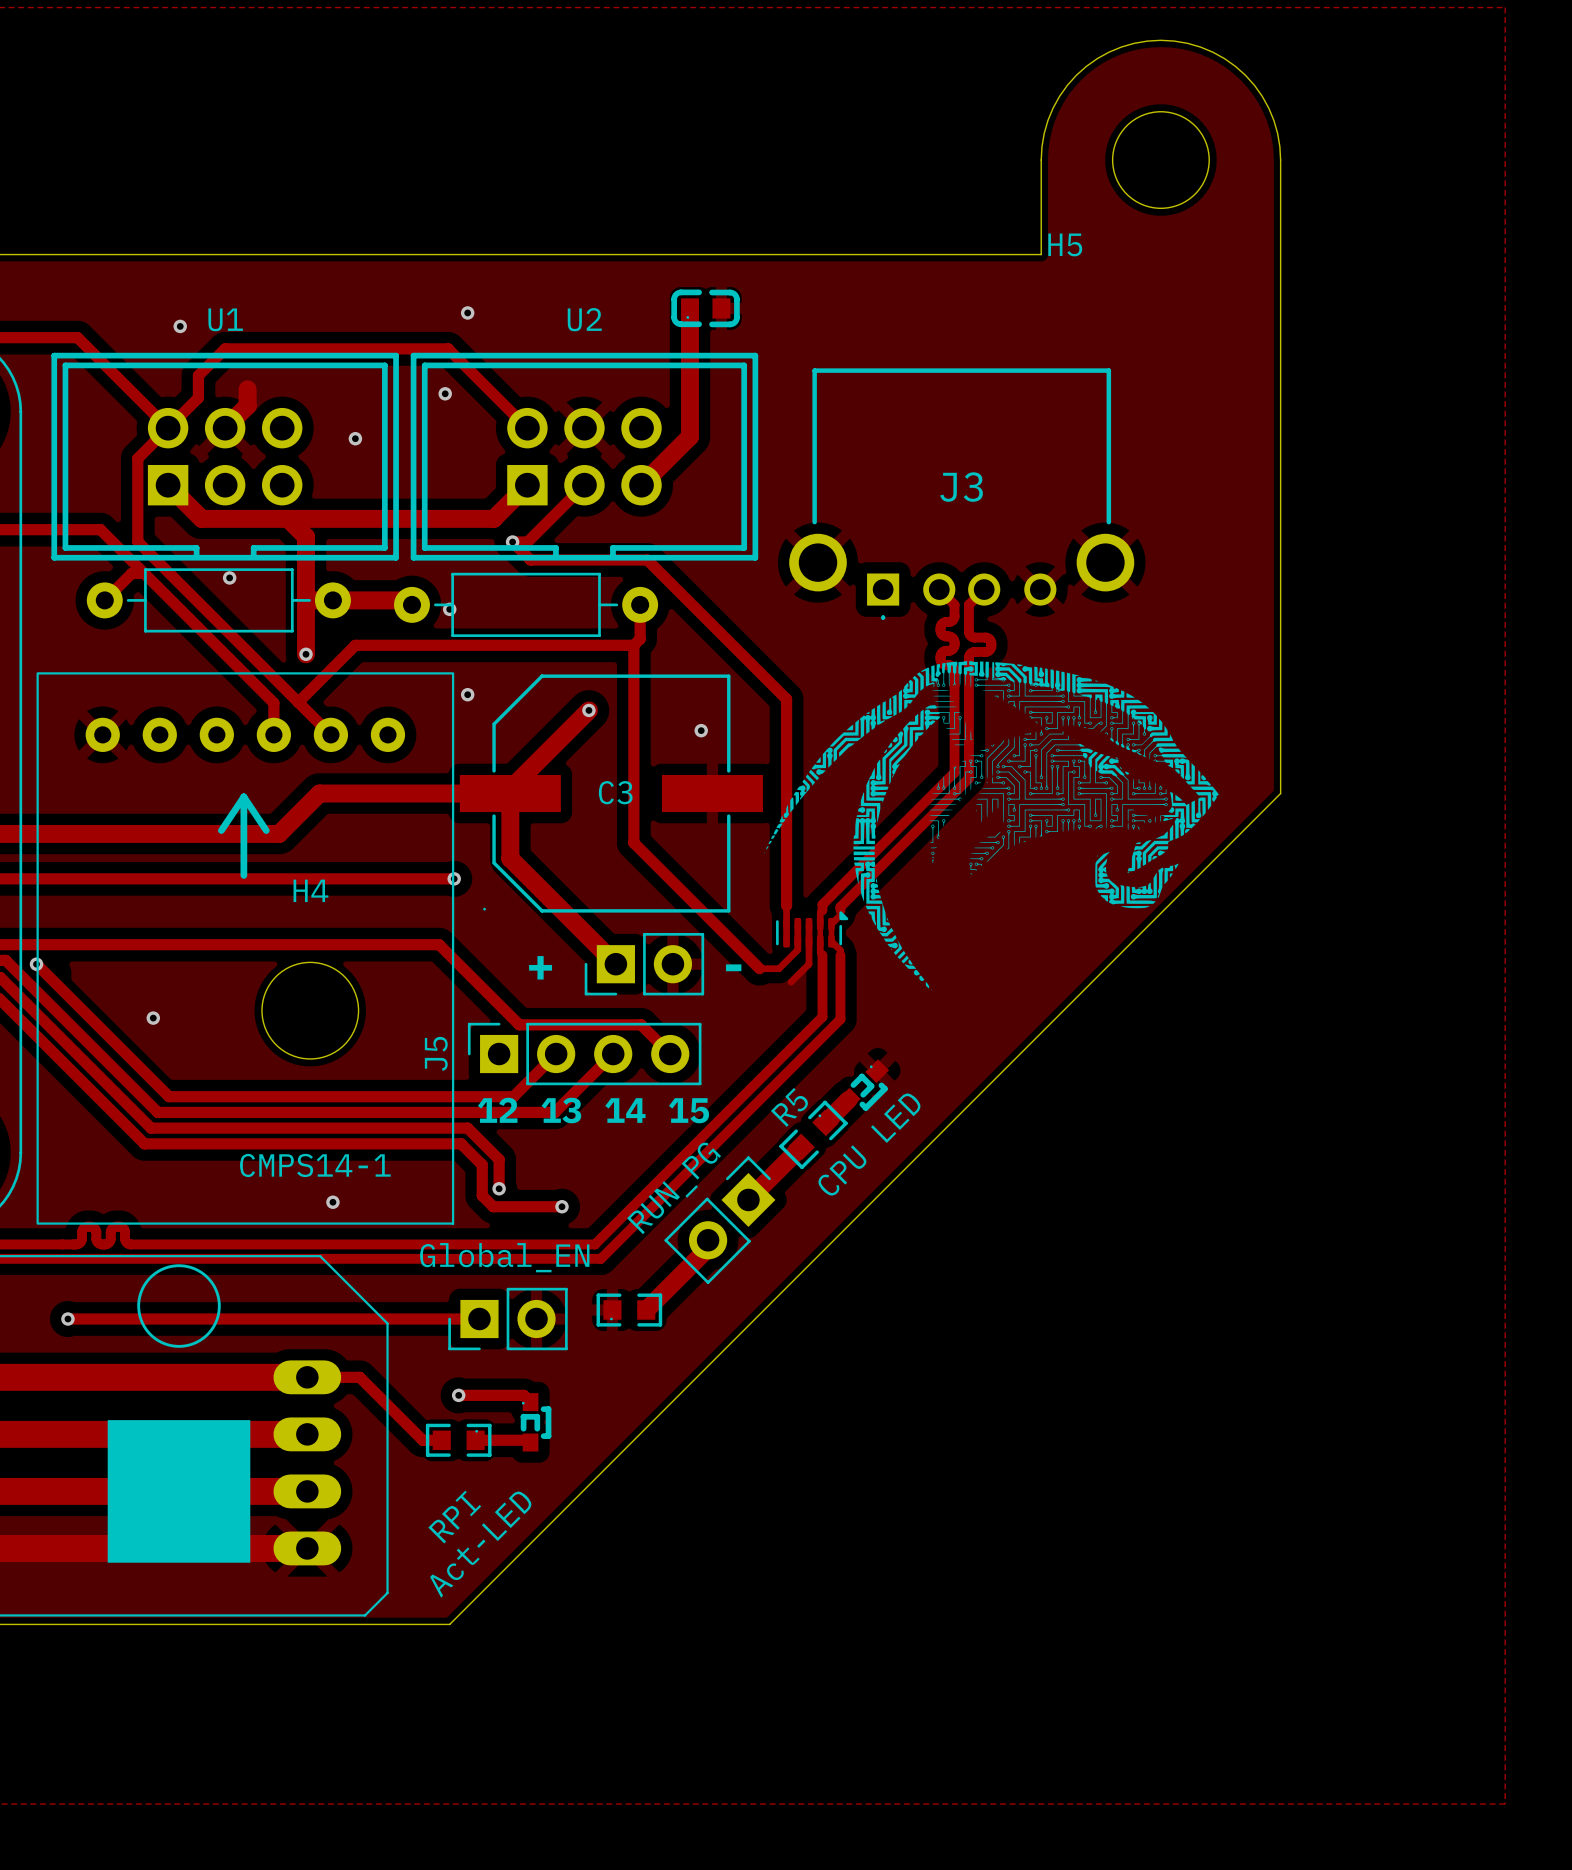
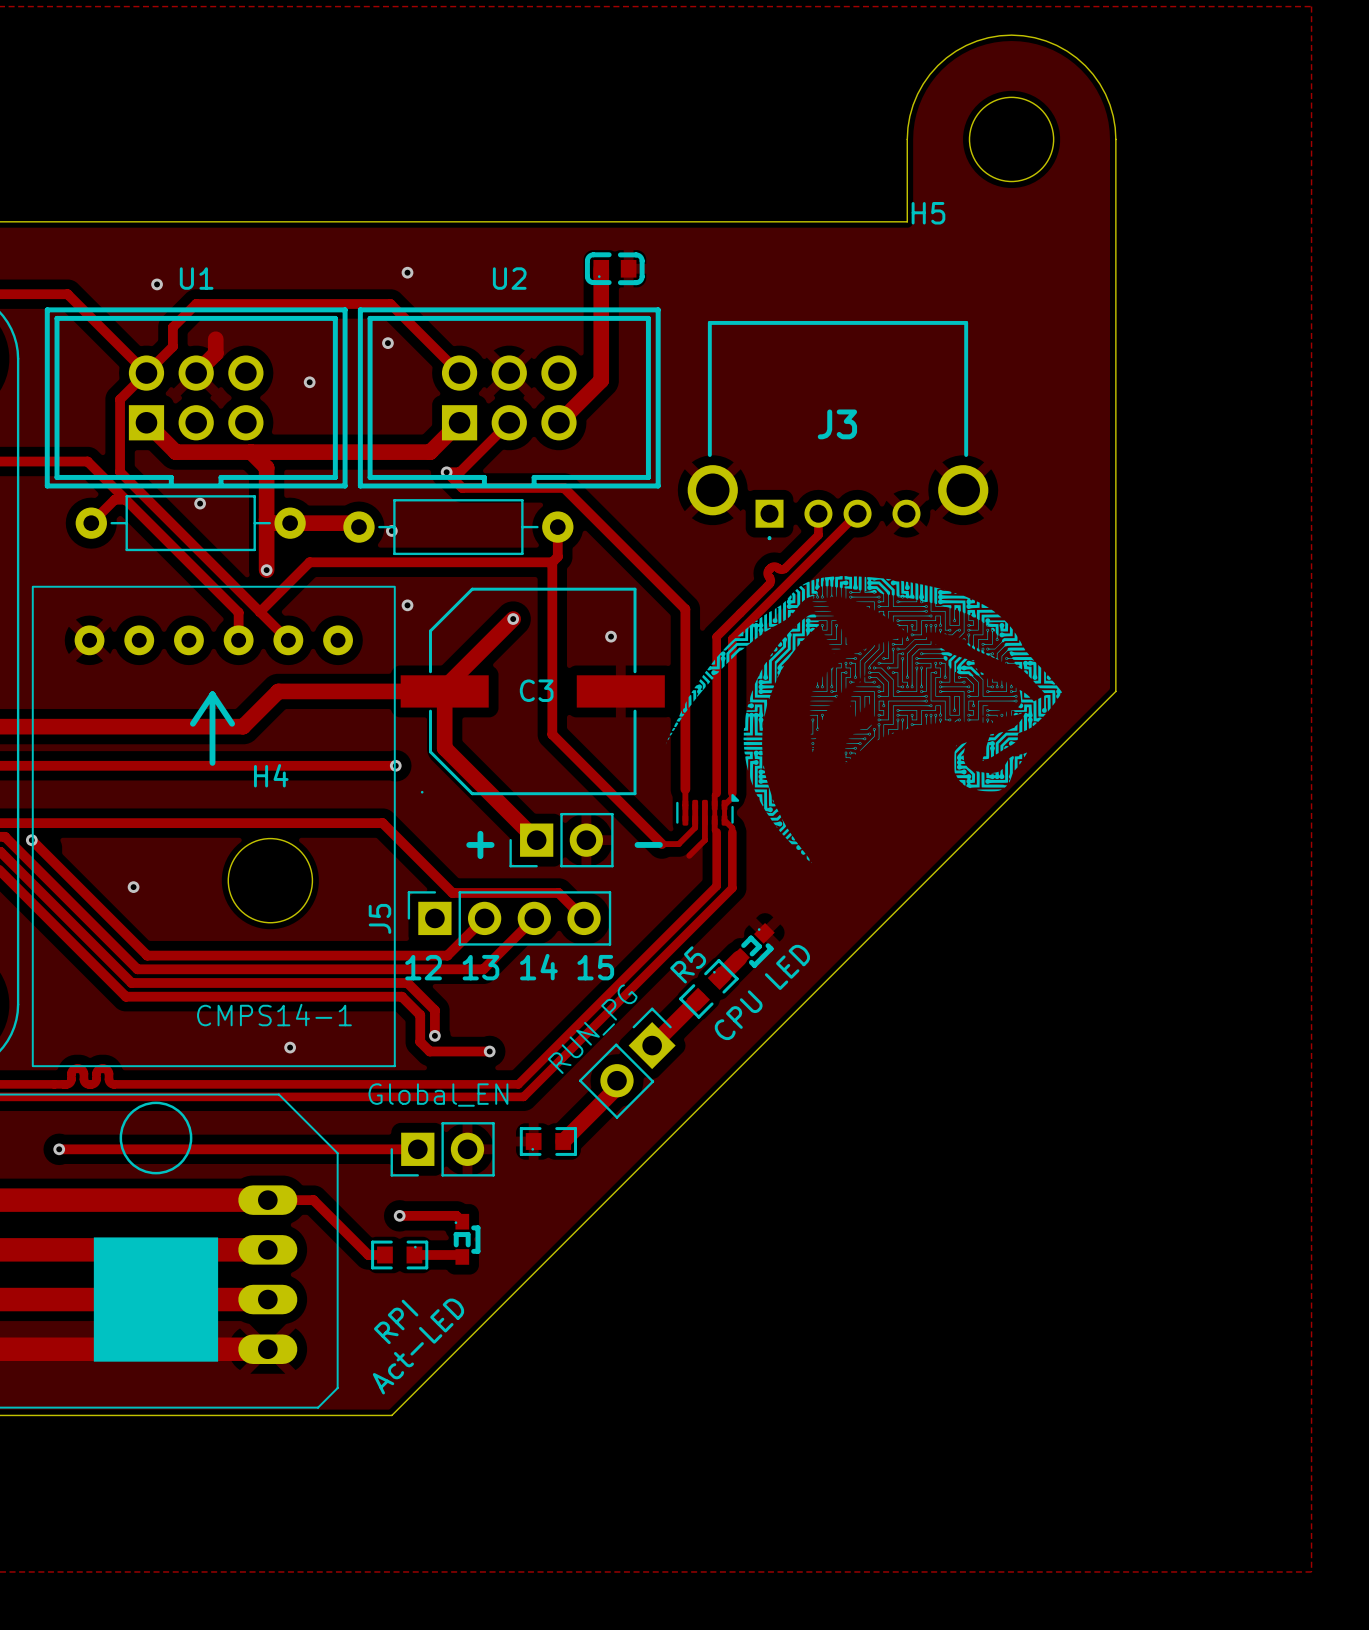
track: (939, 589) (954, 604) (953, 619) (943, 622) (940, 627) (942, 634) (951, 637) (954, 641) (953, 648) (942, 652) (940, 659) (942, 663) (951, 665) (954, 670) (954, 772) (822, 904) -> (769, 577) (769, 583) (716, 636) (716, 788)
track: none -> (818, 513) (818, 535) (784, 568) (778, 568)
track: (968, 604) (969, 634) (973, 637) (987, 638) (991, 643) (988, 651) (973, 652) (968, 656) (968, 778) (840, 906) -> (844, 527) (732, 638) (732, 790)
track: none -> (777, 568) (773, 566) (769, 569) (769, 576)

